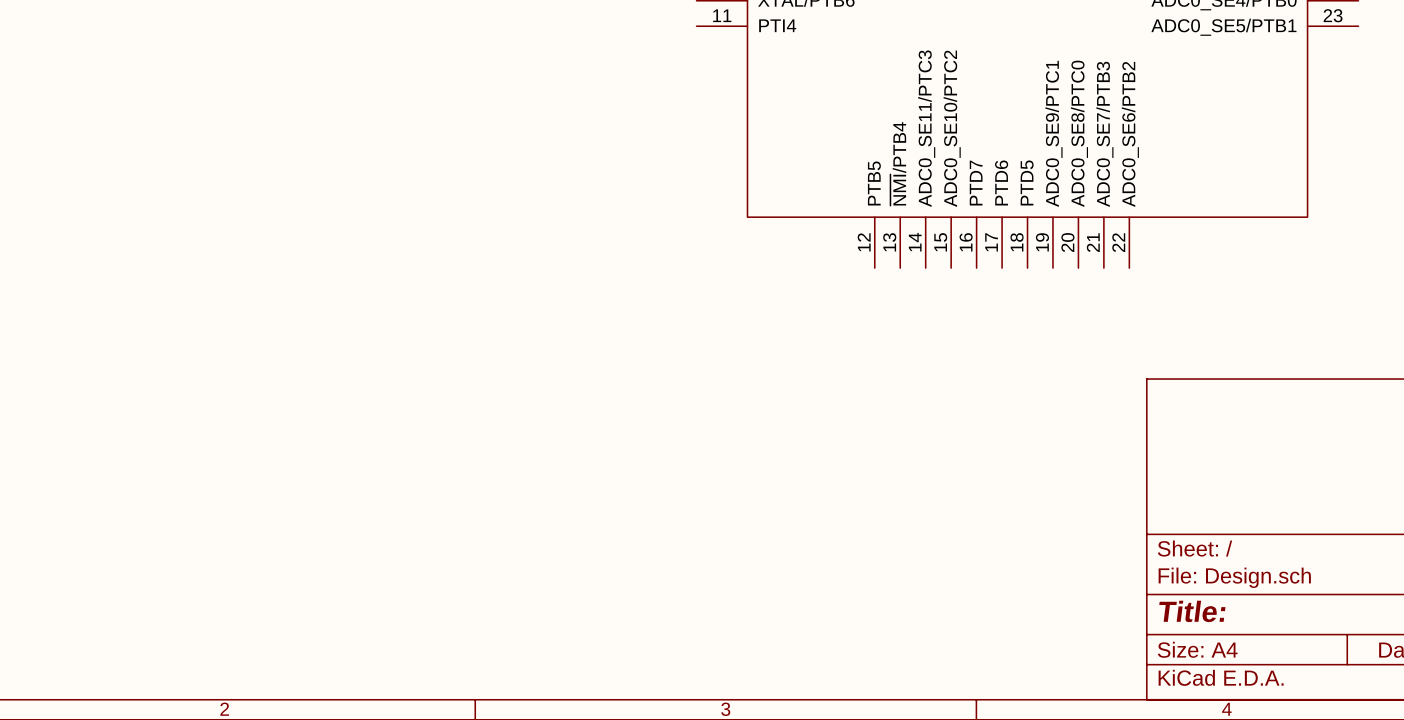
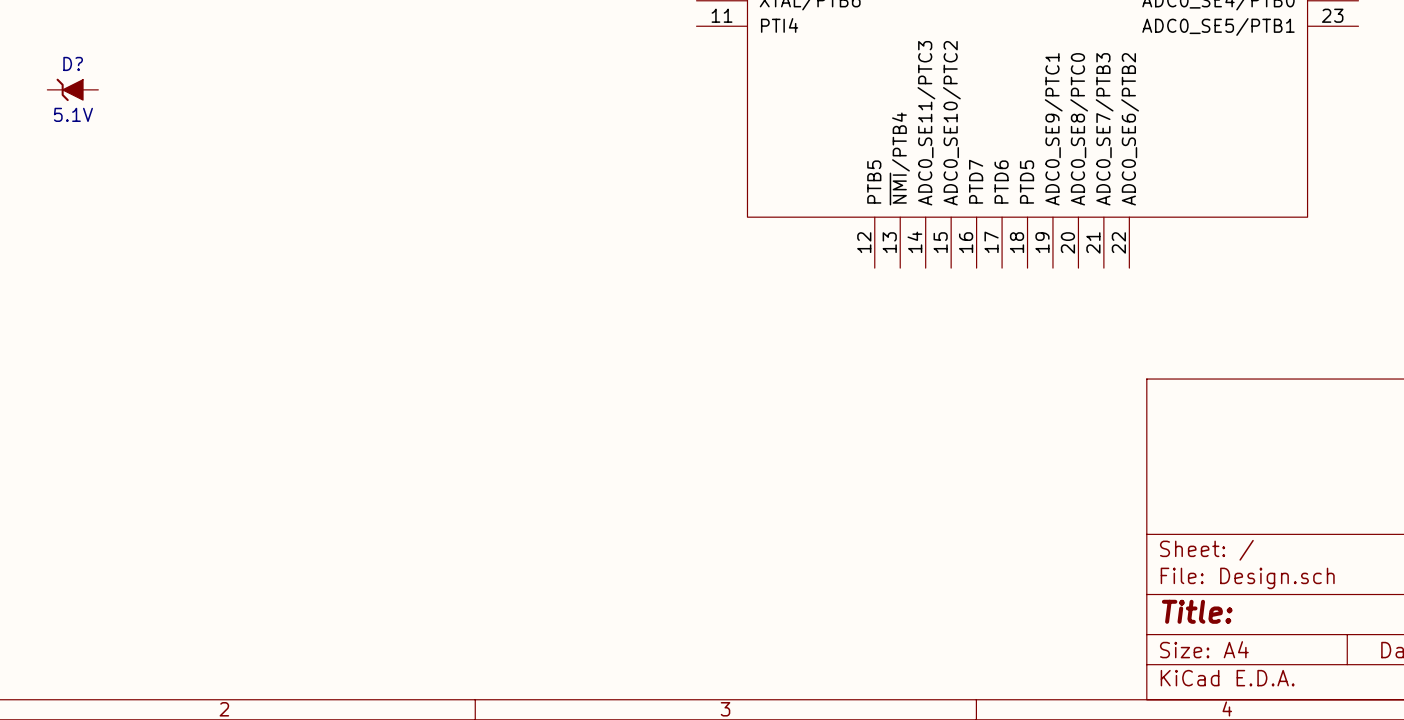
D?: none -> 5.1V (72, 89)

